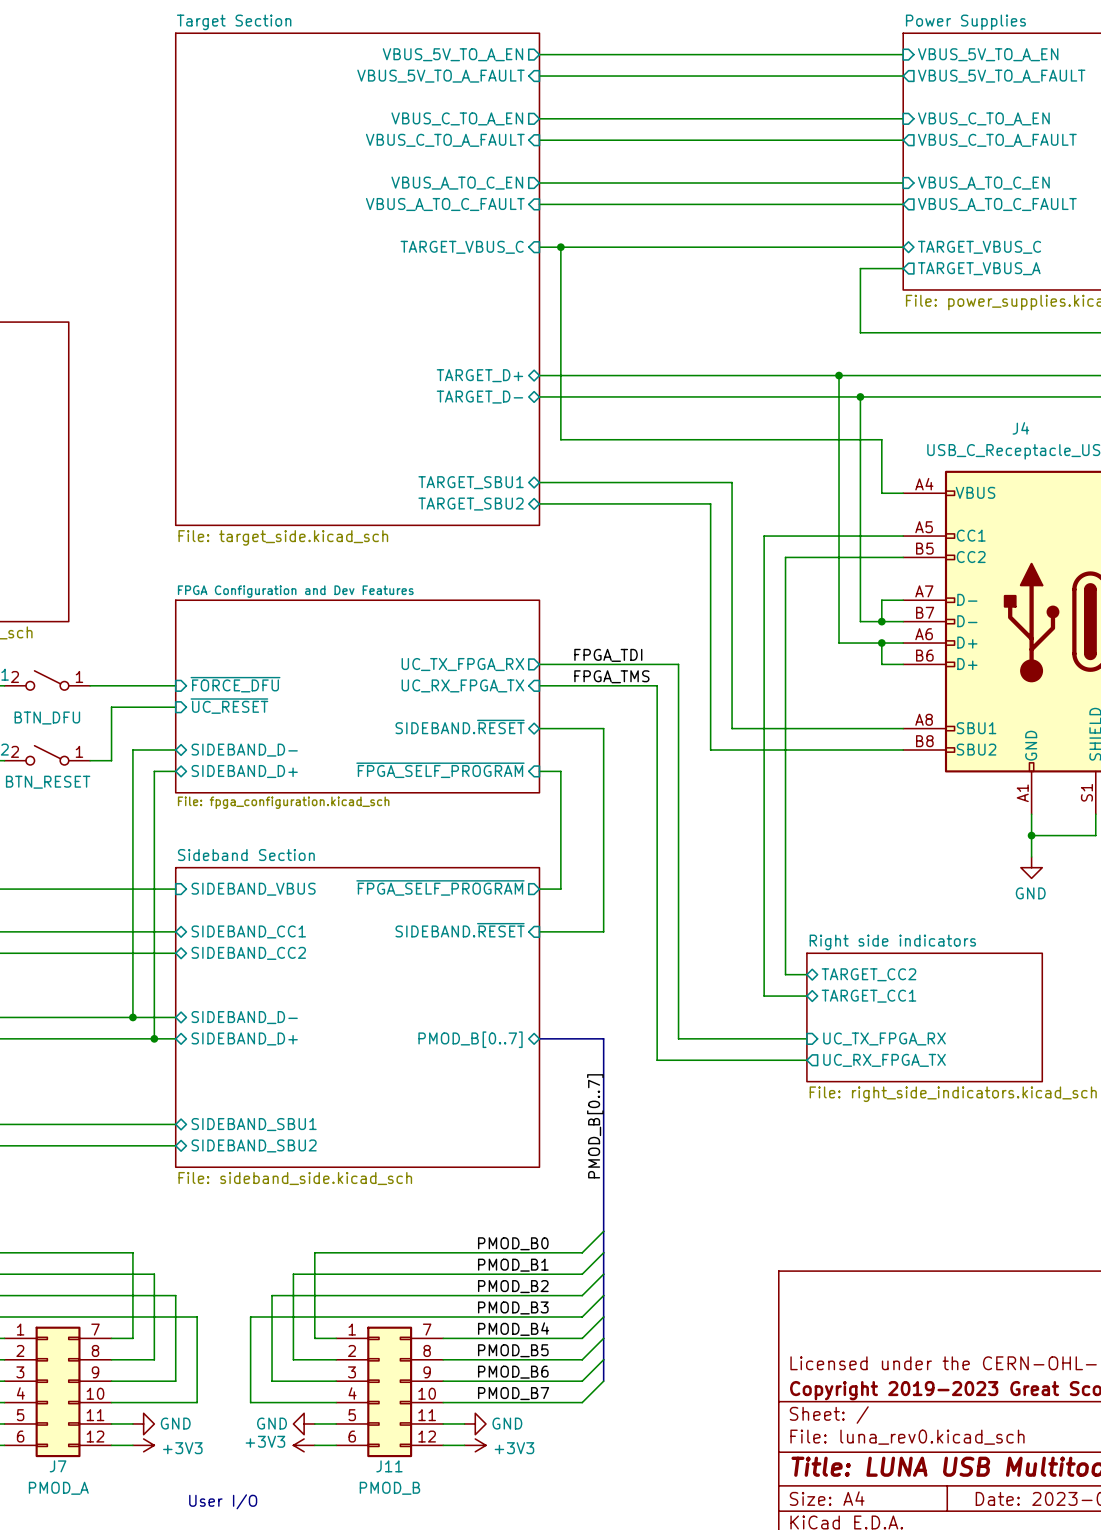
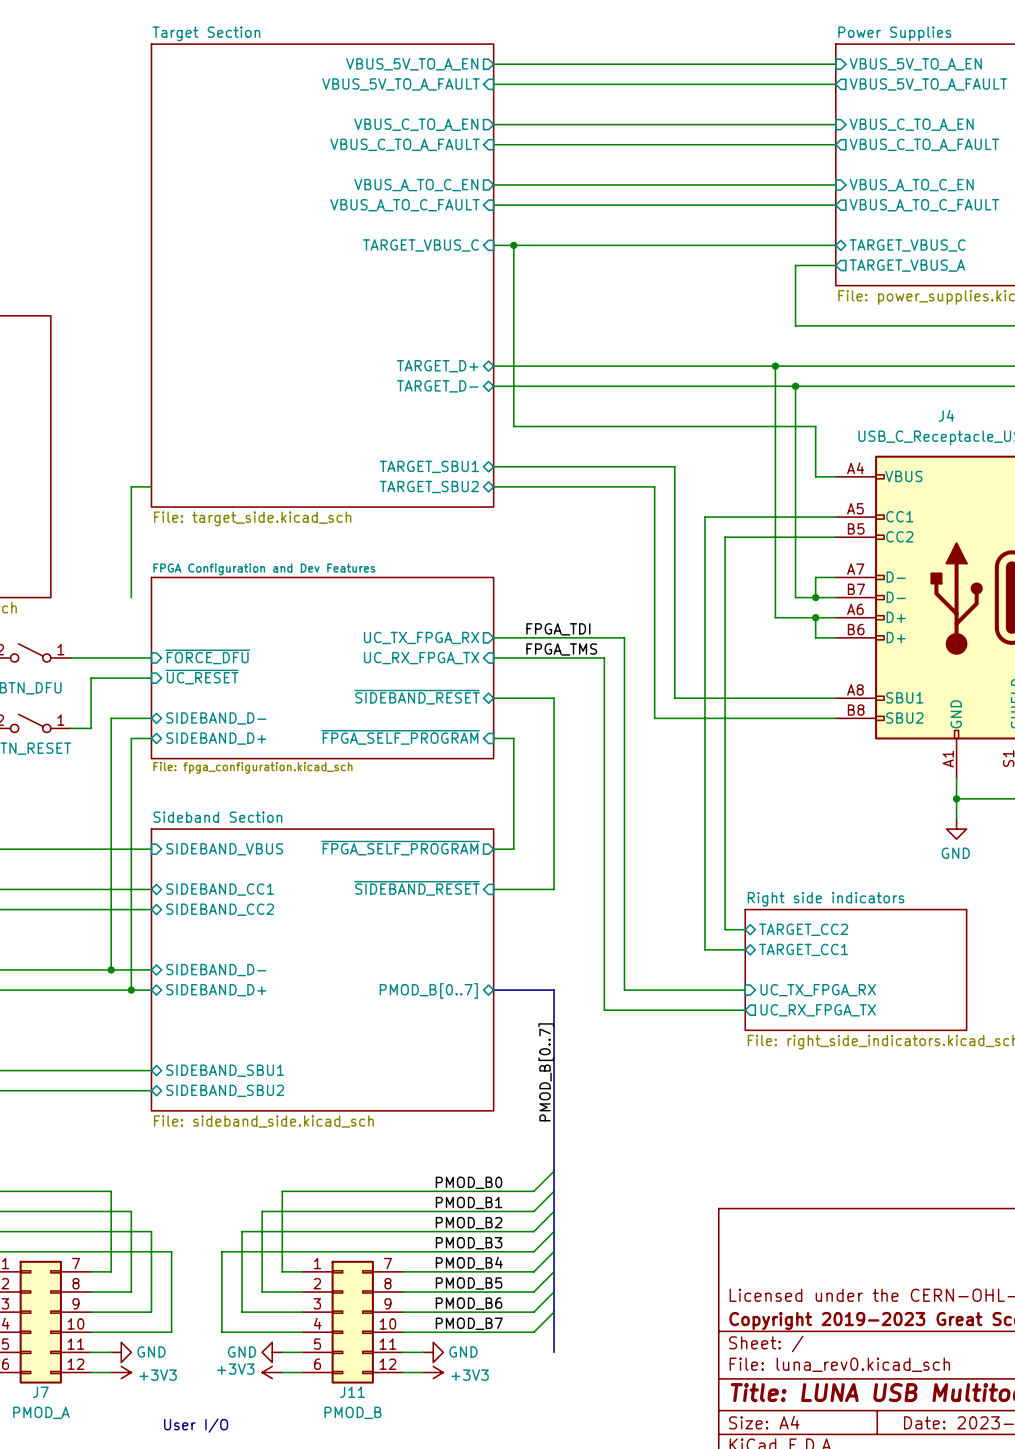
wire: none -> (151, 486) (131, 486) (131, 597)
sheet pin: SIDEBAND.~{RESET} (460, 726) -> ~{SIDEBAND_RESET} (417, 697)
sheet pin: SIDEBAND.~{RESET} (460, 930) -> ~{SIDEBAND_RESET} (417, 888)
bus: none -> (554, 1312) (554, 1352)

